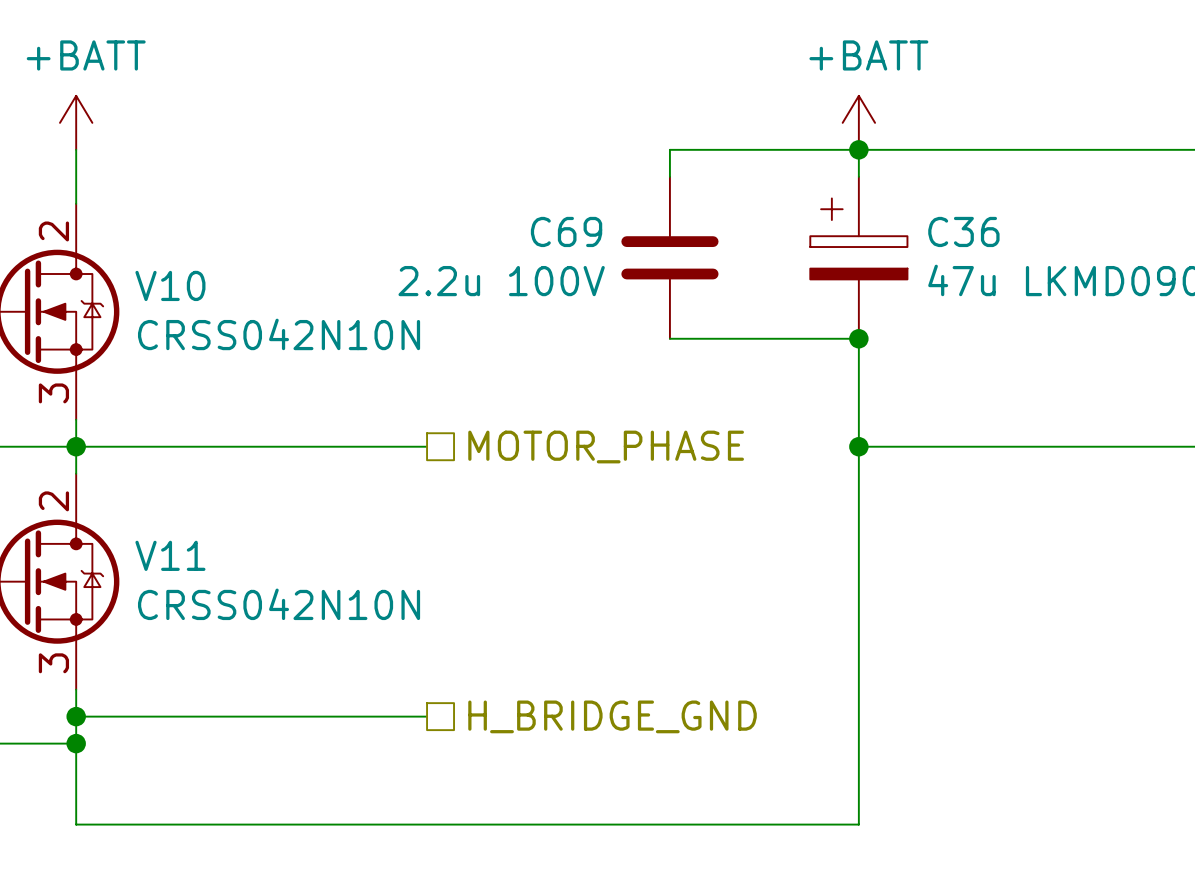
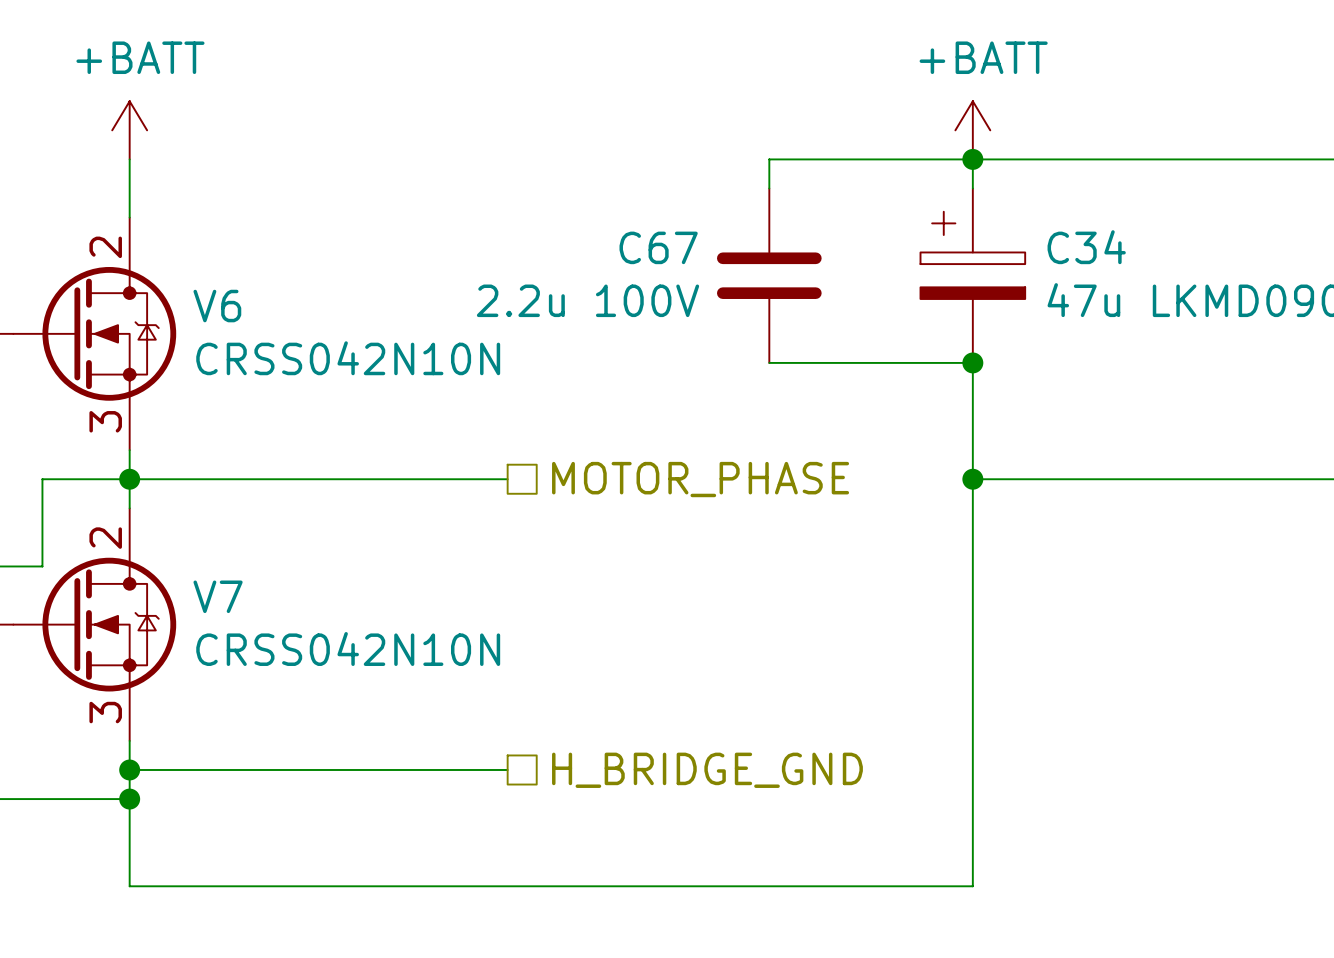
C69 name: C69 (566, 231) -> C67 (658, 247)
C36 name: C36 (963, 231) -> C34 (1086, 247)
V10 name: V10 (170, 285) -> V6 (217, 306)
V11 name: V11 (170, 555) -> V7 (218, 596)

